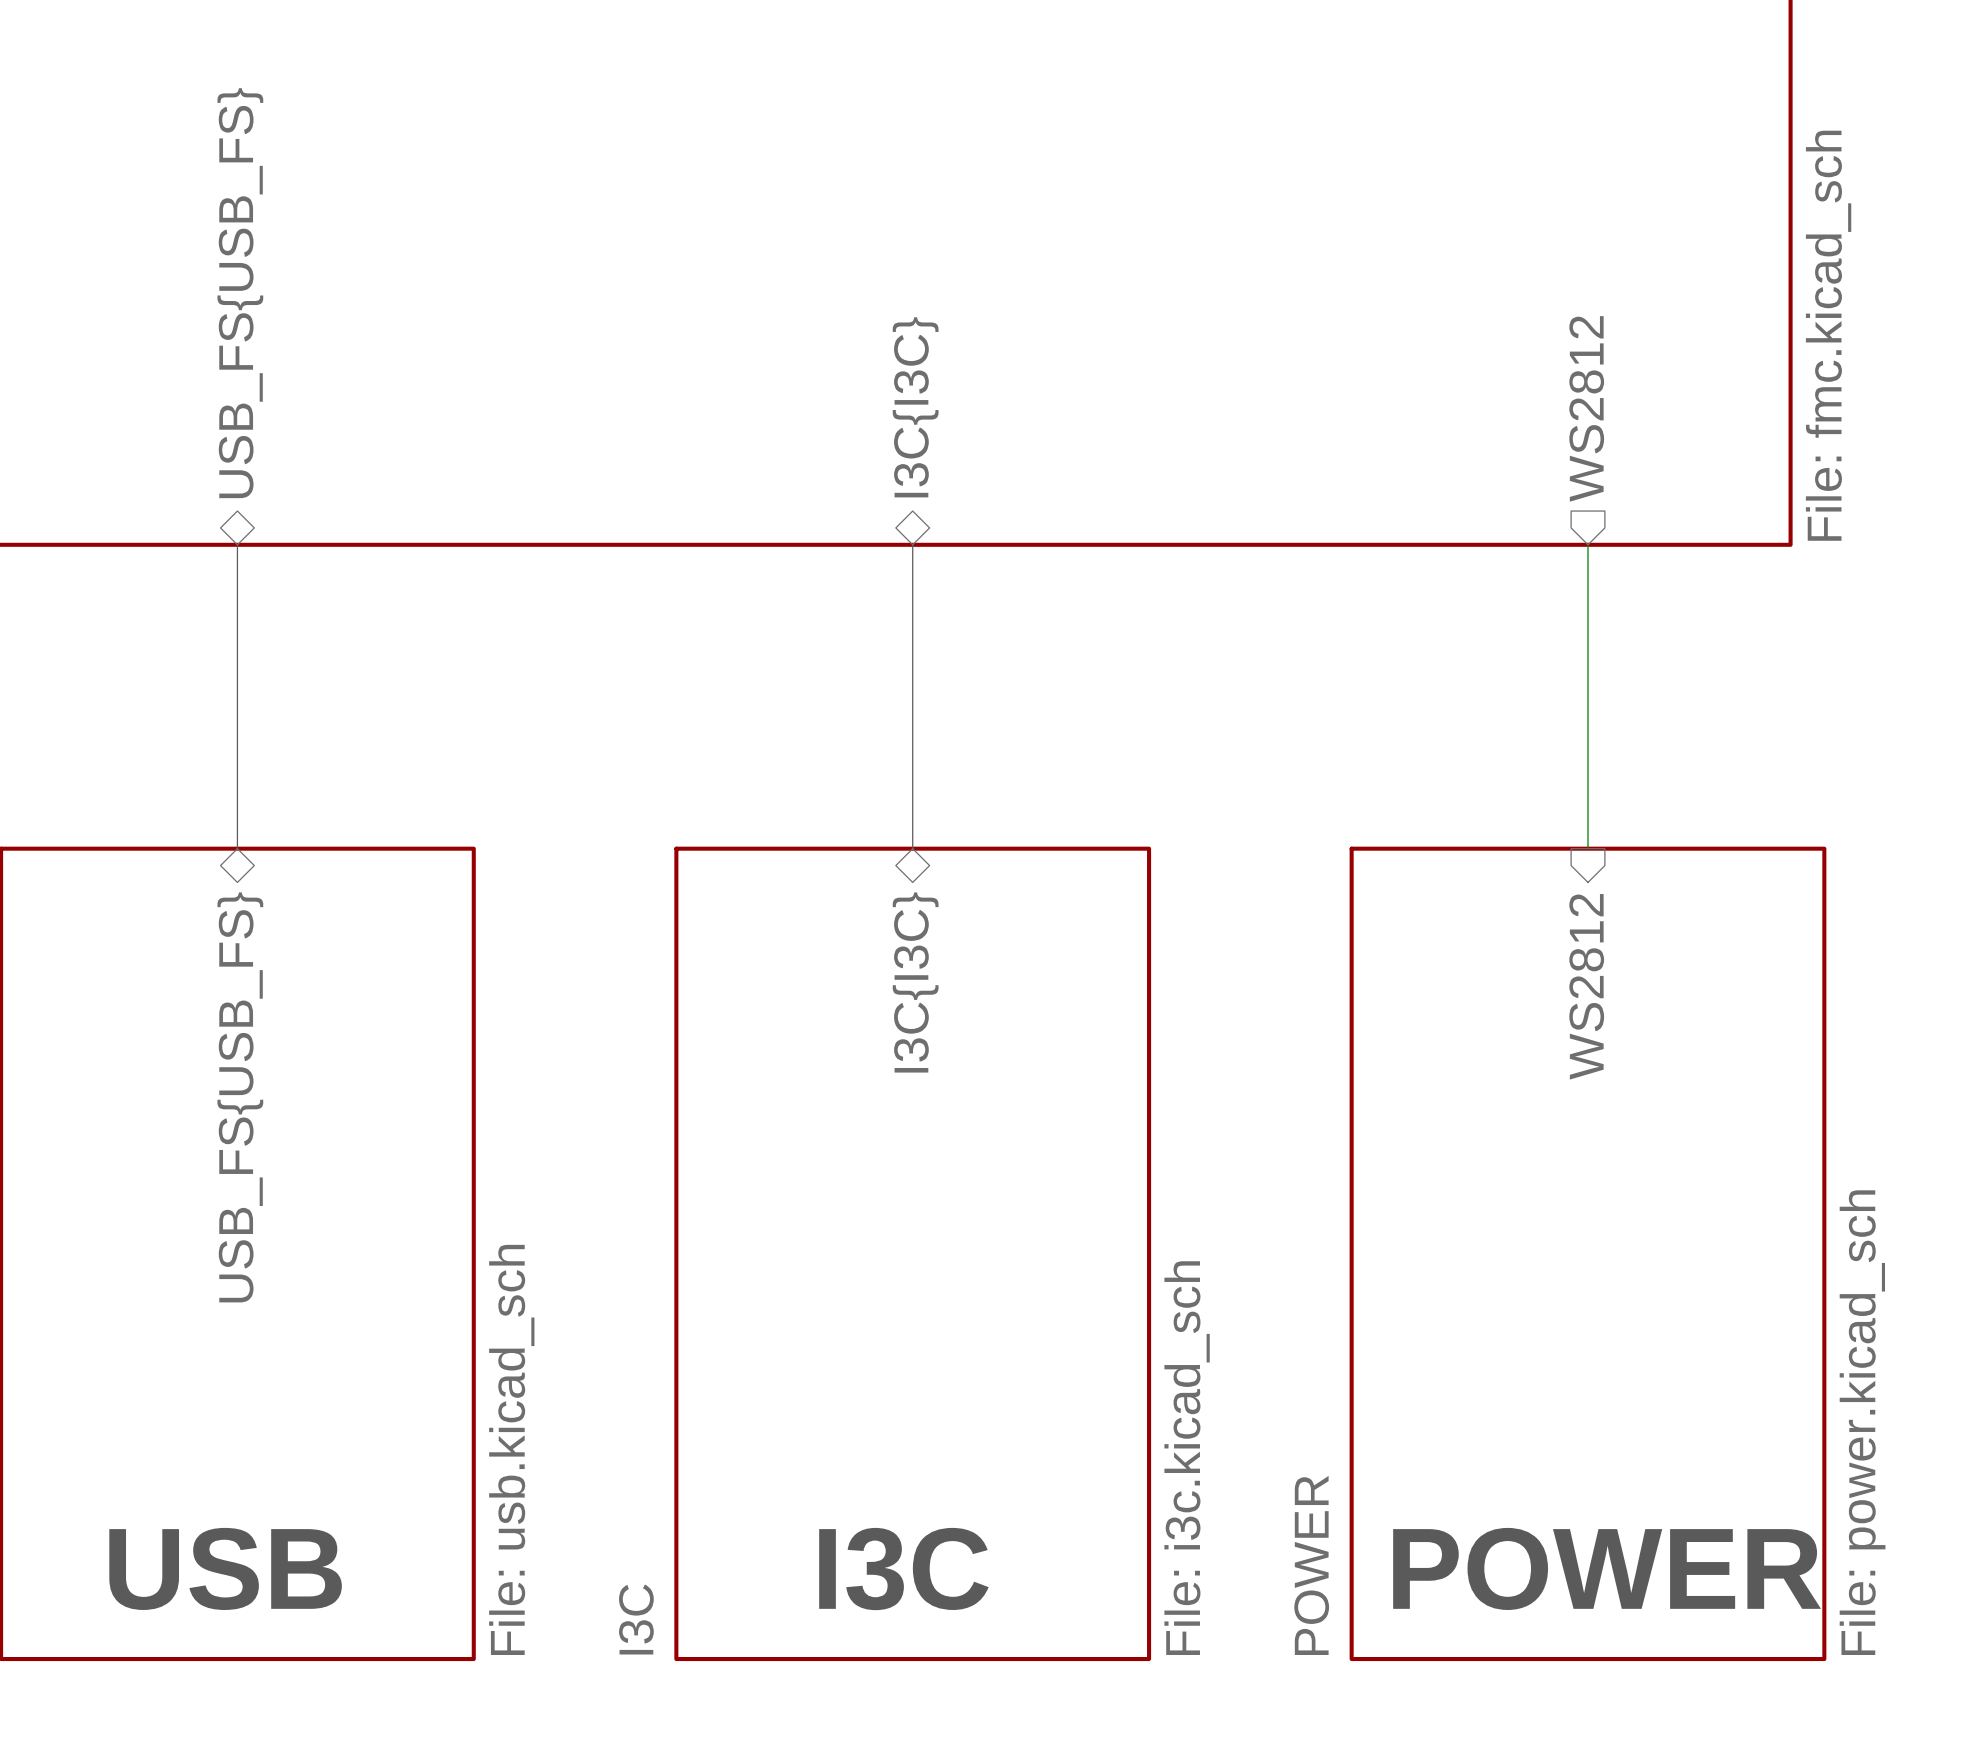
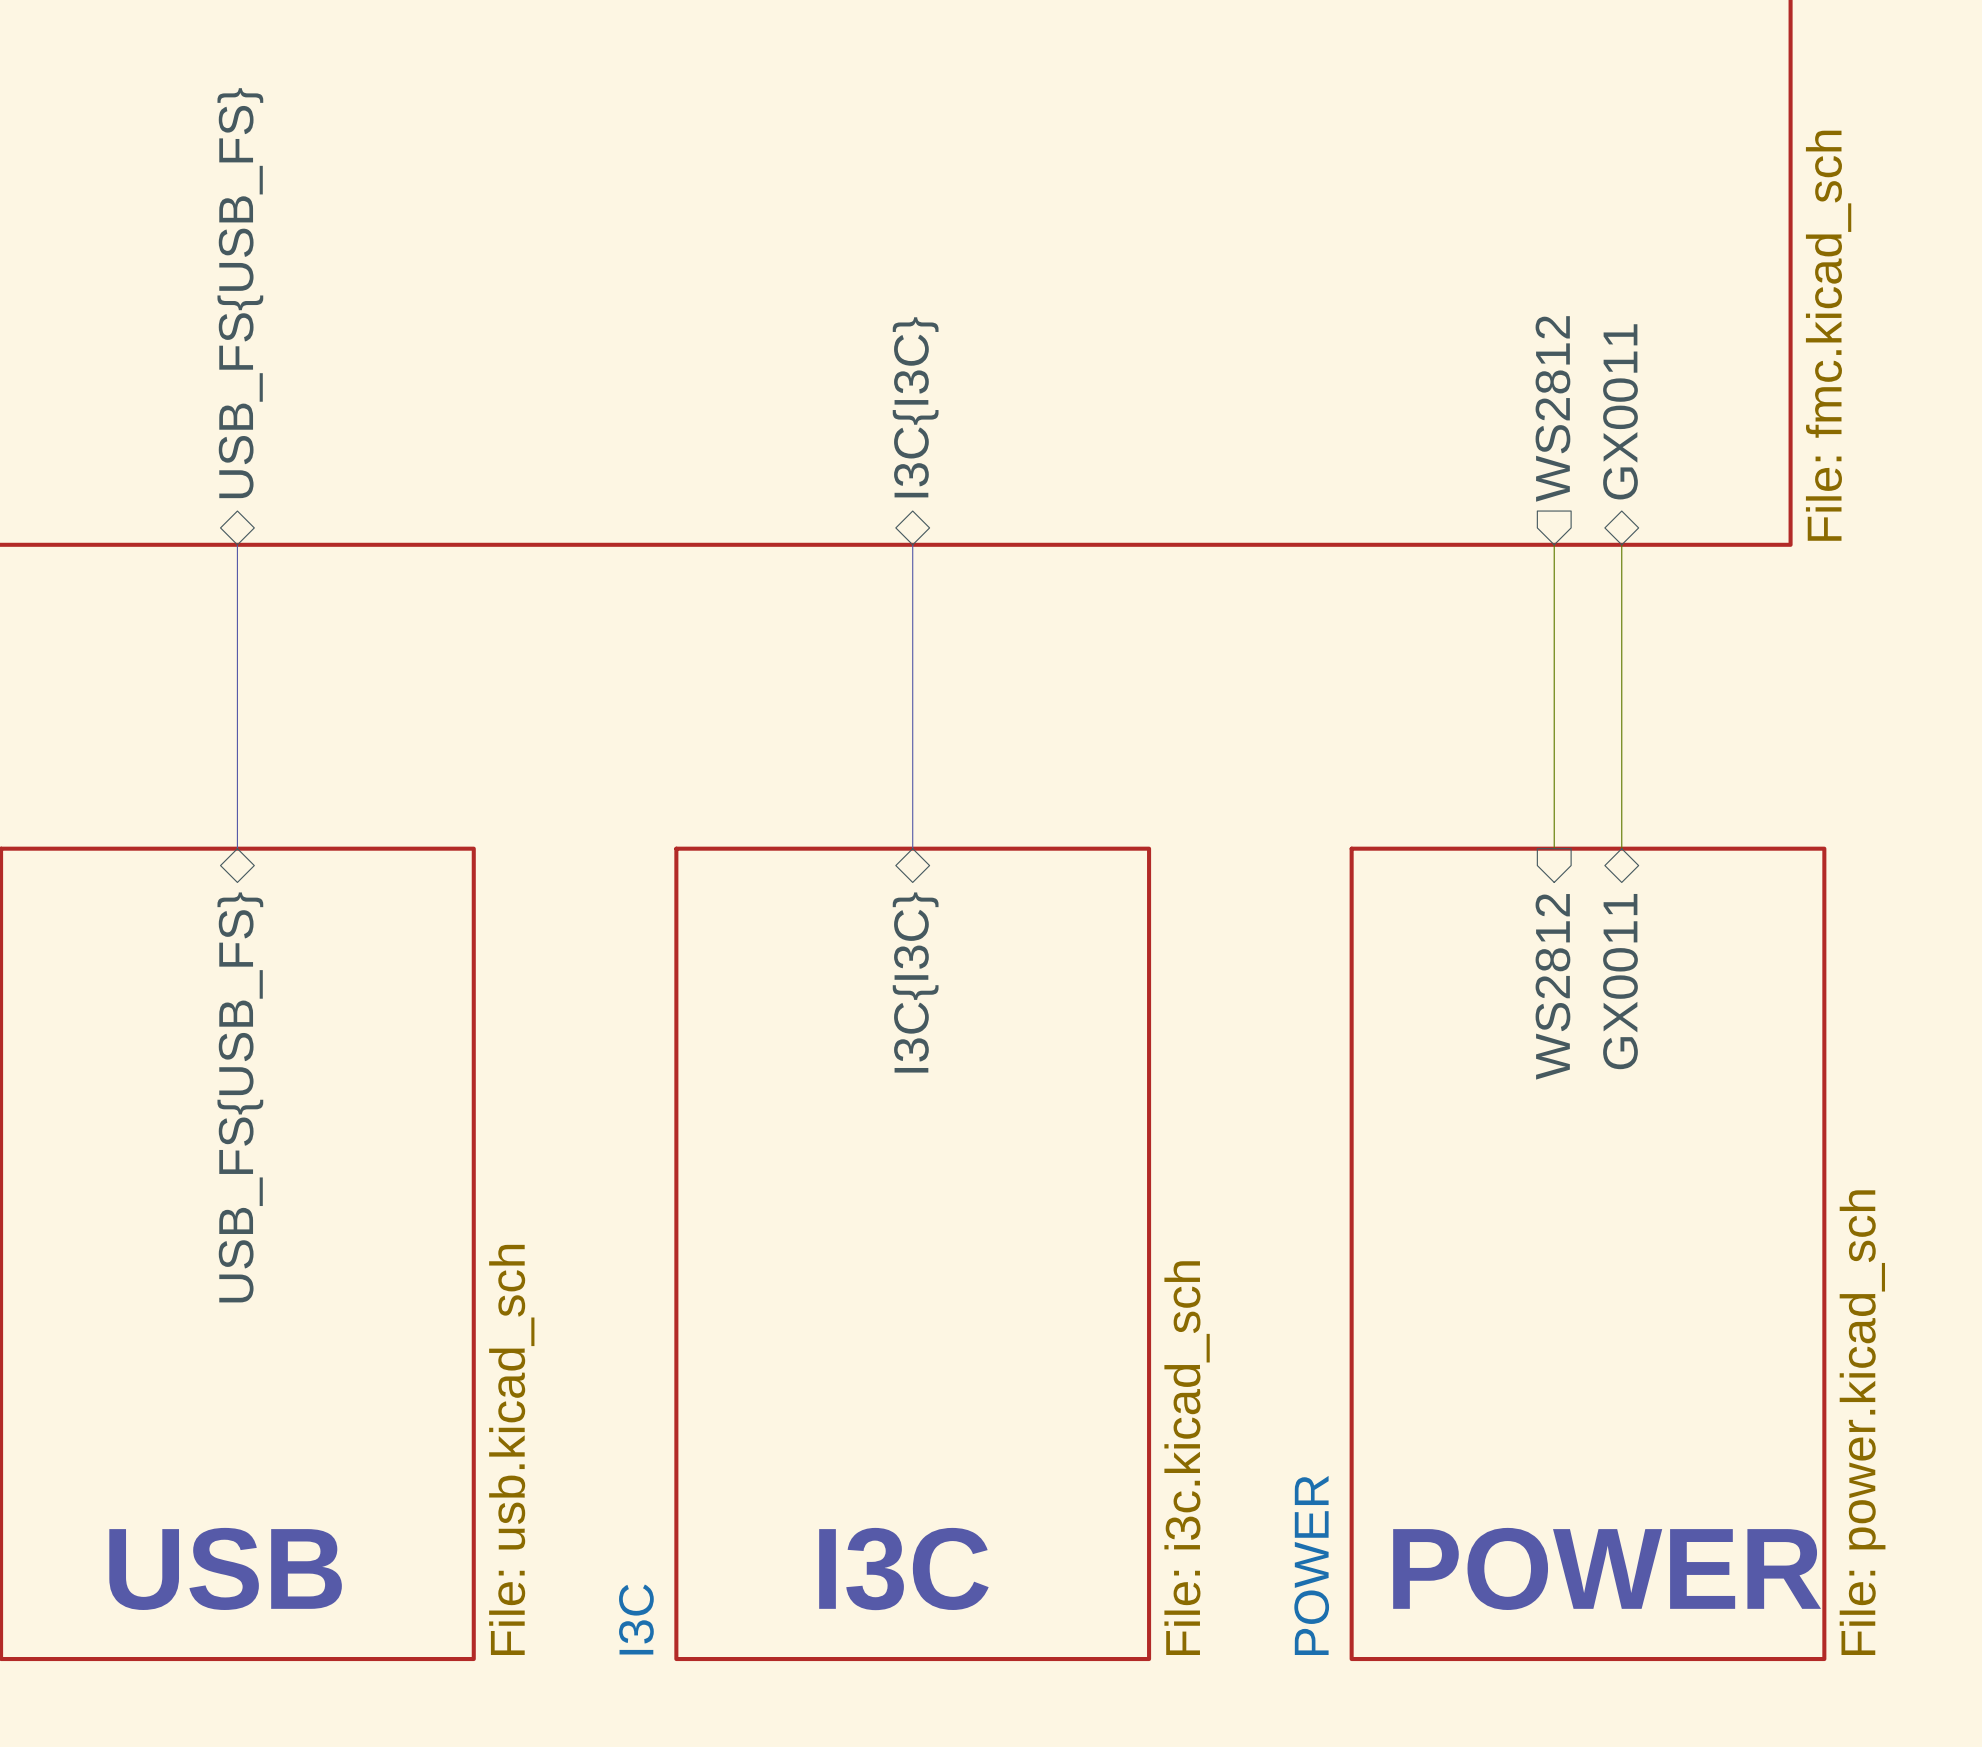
sheet pin position: WS2812 (1586, 408) -> WS2812 (1552, 408)
sheet pin: none -> GX0011 (1620, 411)
wire: (1587, 544) (1587, 848) -> (1554, 544) (1554, 848)
wire: none -> (1621, 544) (1621, 848)
sheet pin: none -> GX0011 (1620, 981)
sheet pin position: WS2812 (1586, 986) -> WS2812 (1552, 986)

